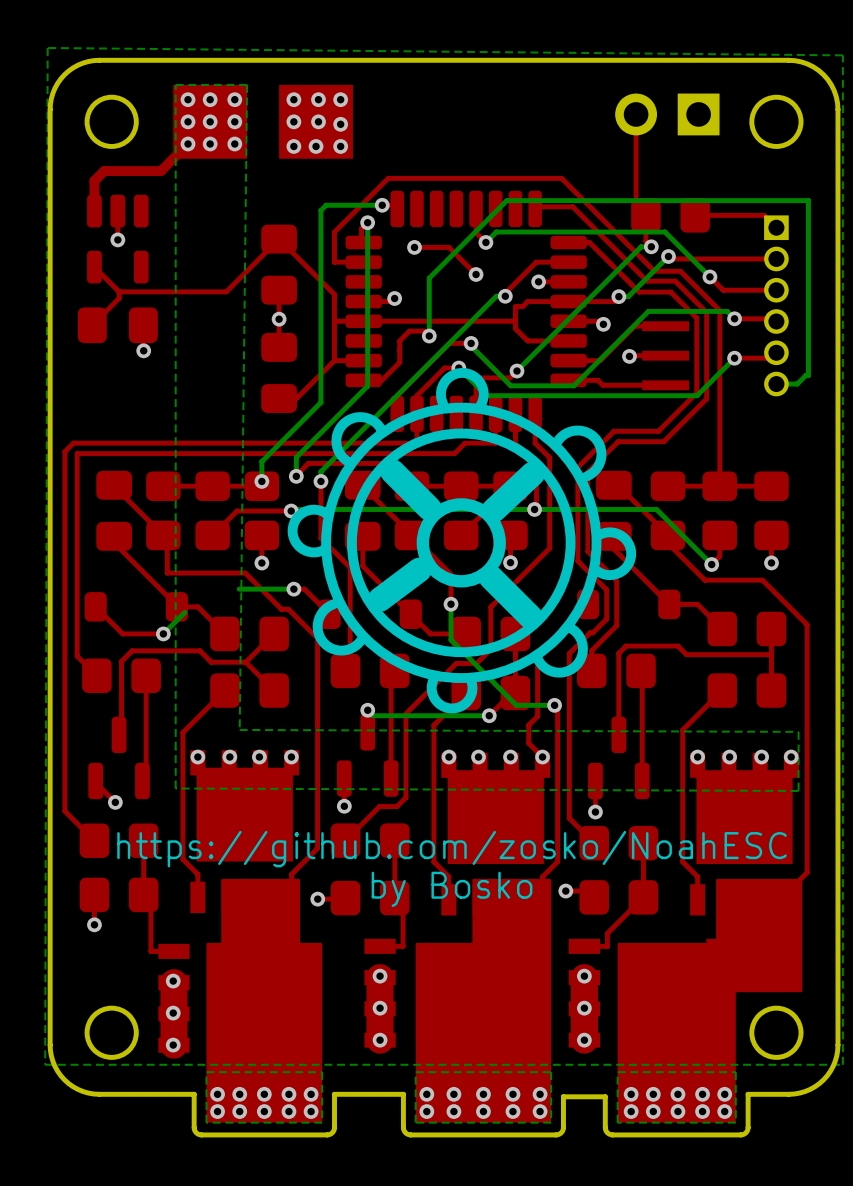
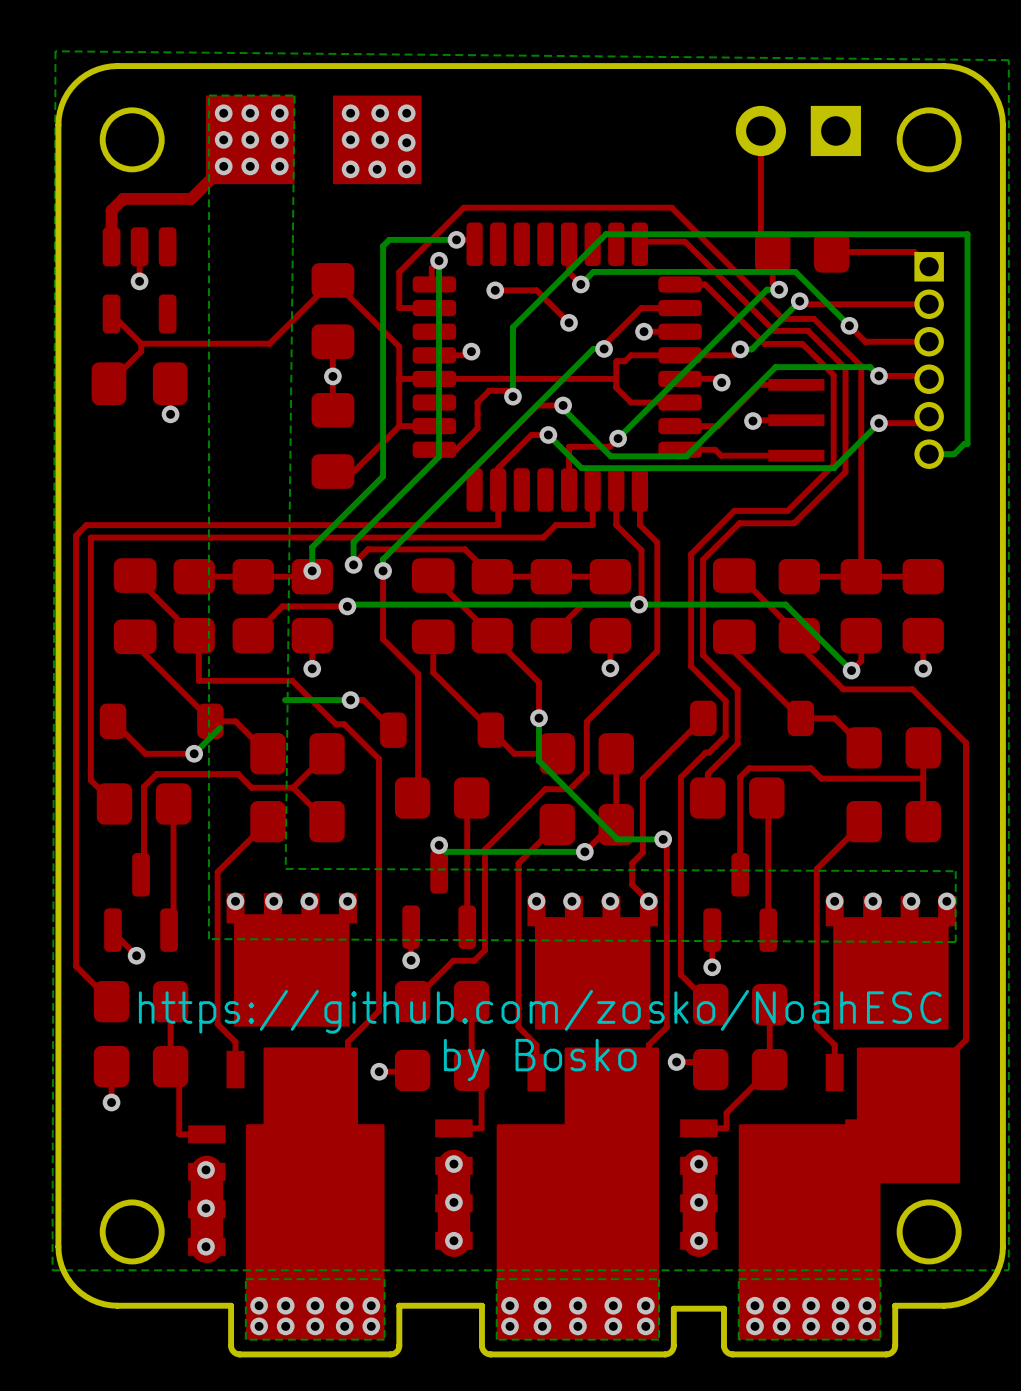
drawing: [321, 402, 602, 683] -> none
line: (443, 403) (441, 390) (445, 381) (453, 374) (463, 372) (473, 376) (482, 386) (483, 396) (480, 406) -> none
line: (382, 432) (375, 422) (364, 417) (352, 418) (344, 422) (337, 432) (336, 444) (341, 455) (348, 461) -> none
line: (557, 441) (565, 433) (577, 430) (586, 432) (595, 438) (600, 449) (601, 458) (596, 469) (586, 476) -> none
line: (392, 471) (429, 508) -> none
line: (532, 473) (493, 510) -> none
line: (325, 513) (316, 509) (305, 511) (295, 519) (292, 529) (294, 539) (301, 548) (310, 552) (323, 550) -> none
line: (600, 534) (610, 532) (620, 535) (628, 542) (631, 555) (627, 565) (618, 573) (607, 575) (597, 571) -> none
line: (419, 569) (380, 599) -> none
line: (490, 577) (530, 616) -> none
line: (333, 604) (325, 608) (319, 618) (317, 630) (322, 640) (331, 648) (342, 650) (353, 647) (360, 641) -> none
line: (572, 629) (578, 635) (582, 645) (581, 657) (574, 666) (564, 672) (552, 671) (542, 665) (537, 658) -> none
line: (434, 678) (431, 688) (434, 697) (441, 705) (450, 708) (460, 706) (468, 700) (472, 690) (471, 680) -> none

